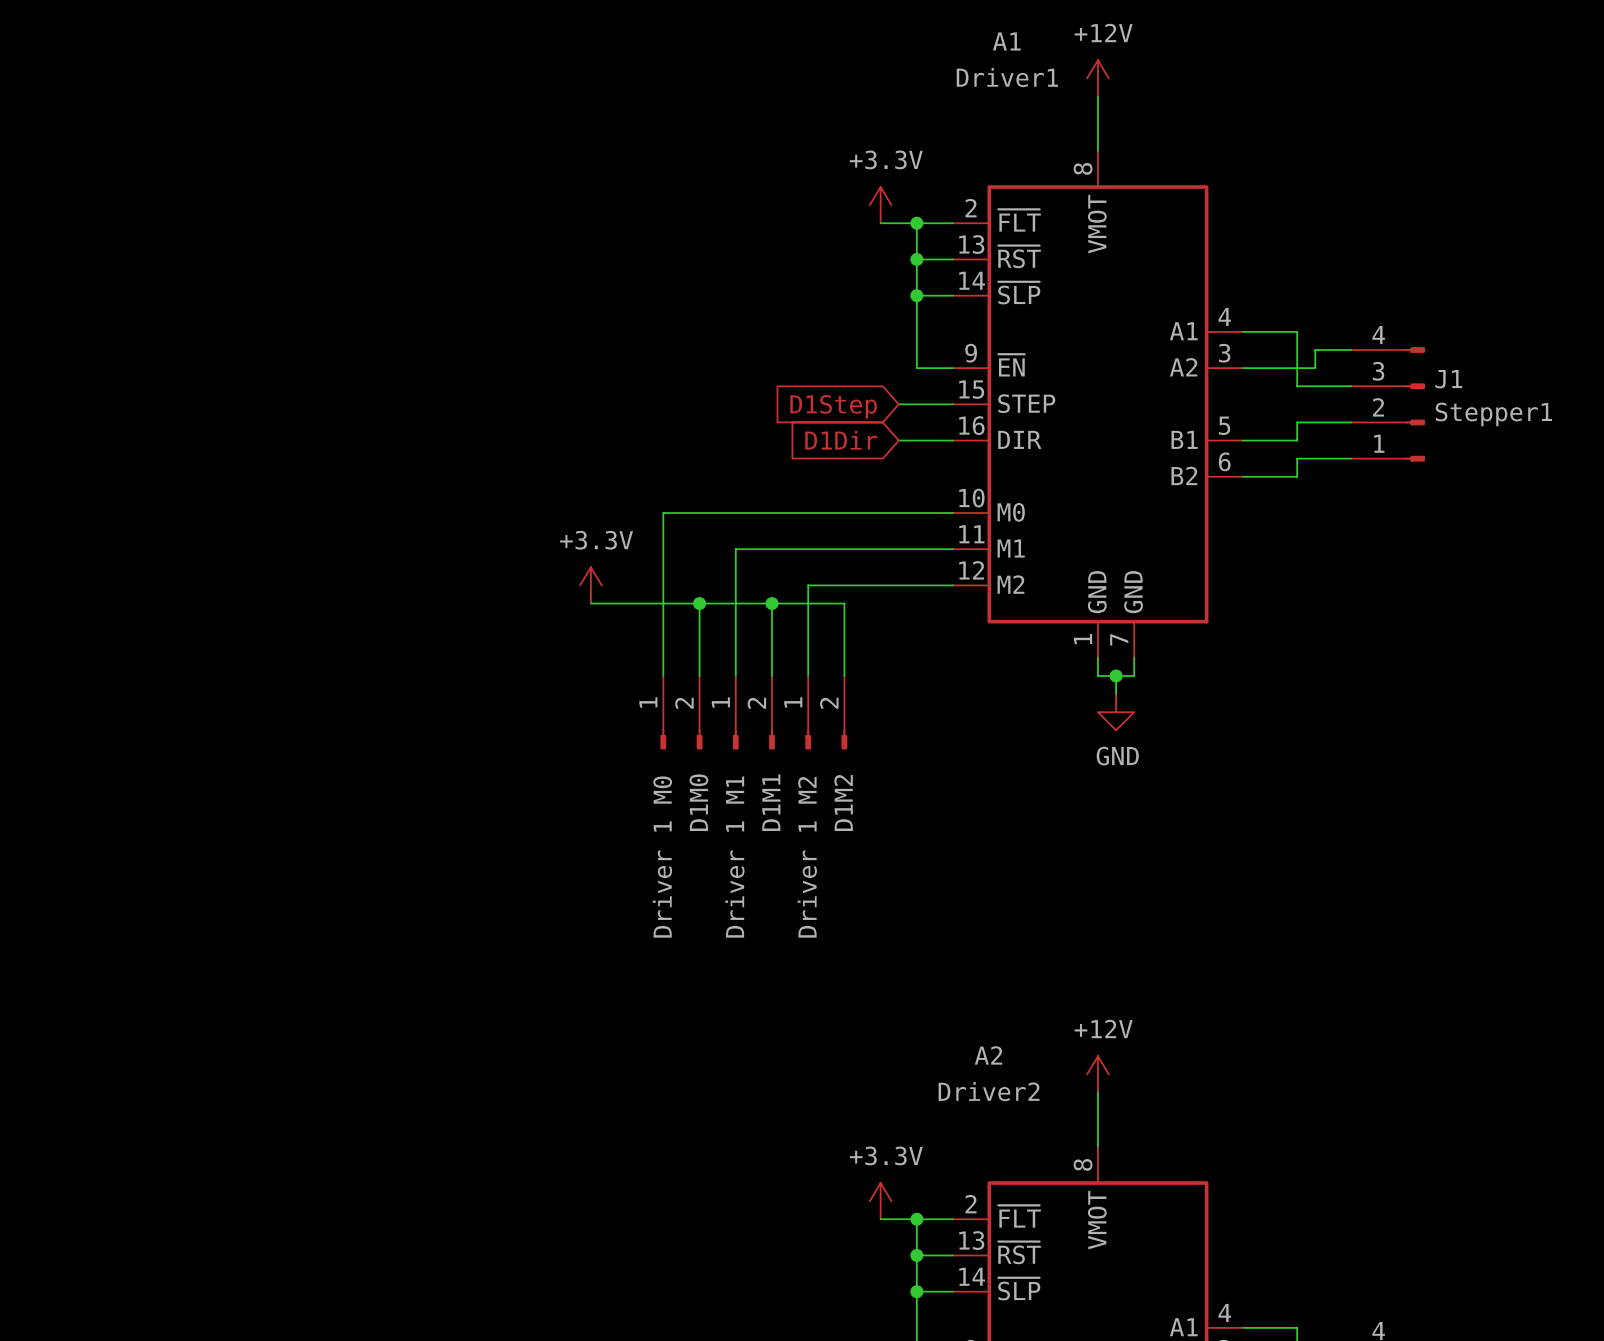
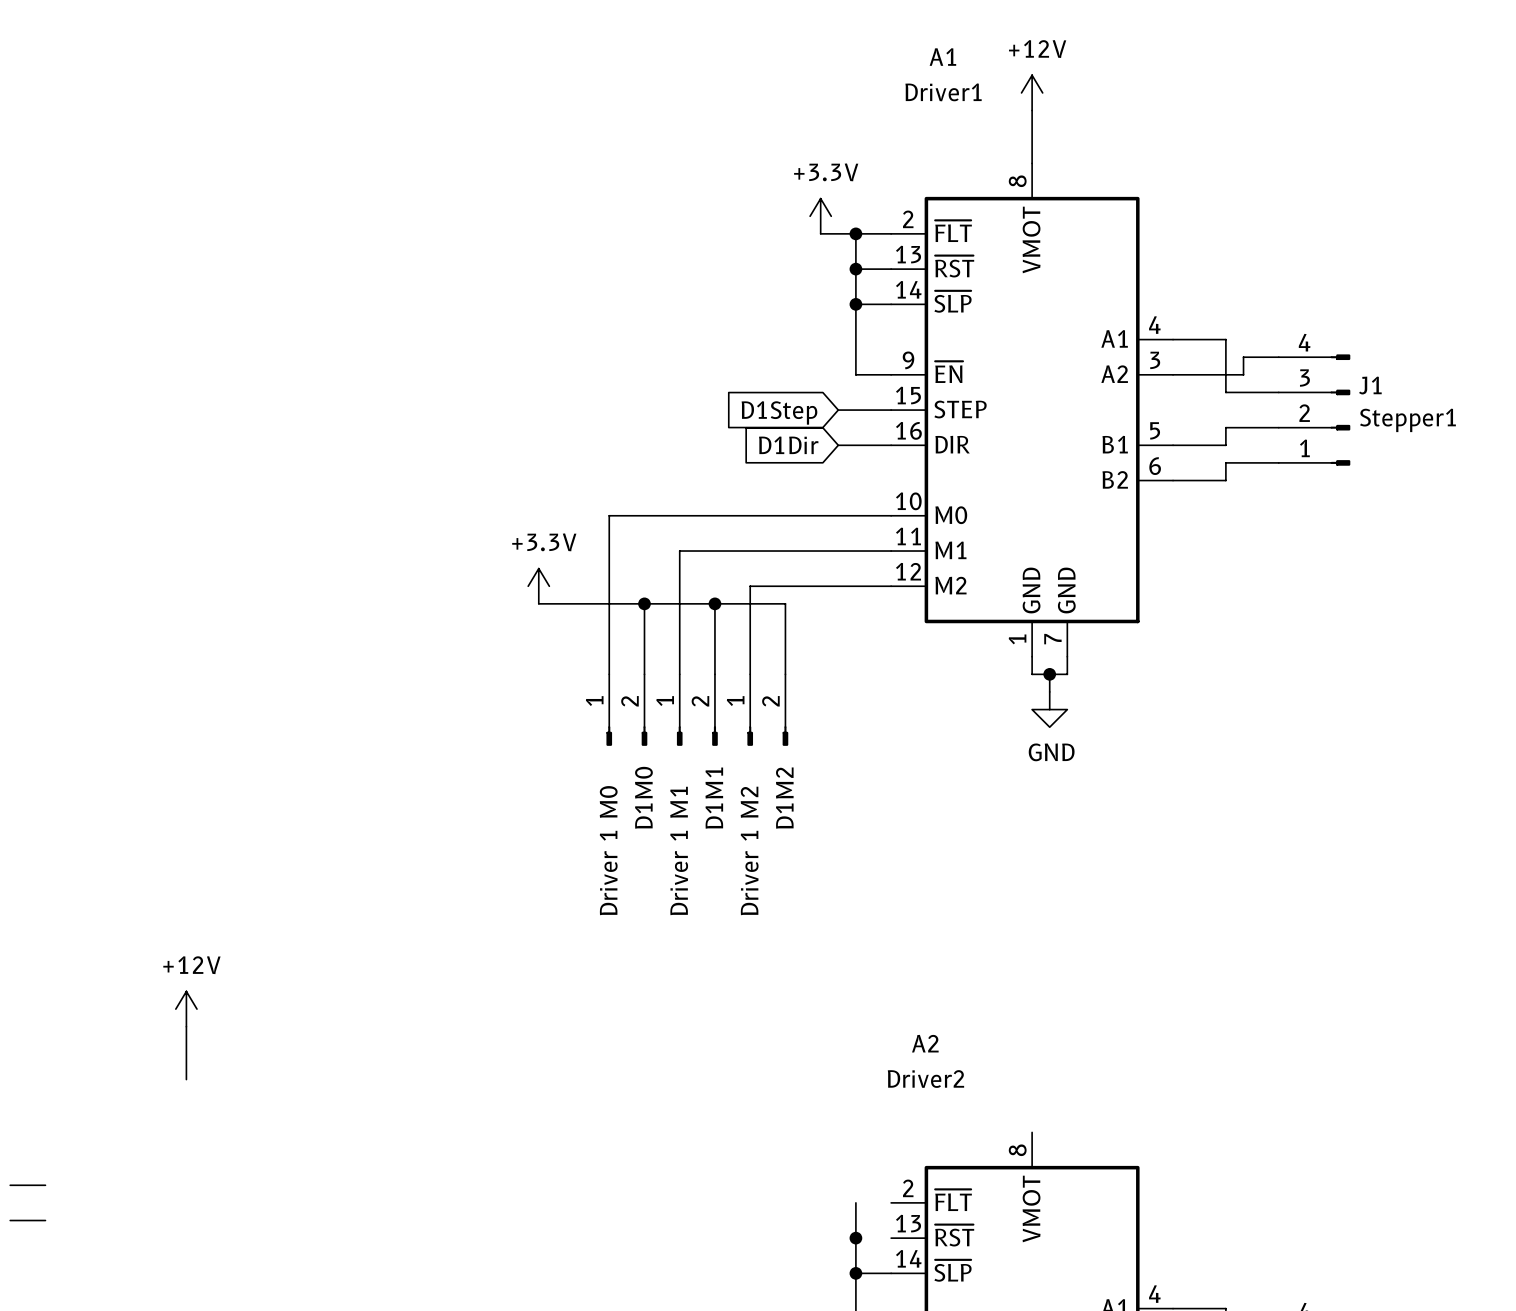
power symbol: none -> +12V (186, 1009)
wire: none -> (186, 1026) (186, 1079)
power symbol: +12V (1097, 1074) -> none
wire: (1097, 1092) (1097, 1146) -> none
wire: none -> (10, 1185) (45, 1185)
power symbol: +3.3V (880, 1201) -> none
wire: (880, 1219) (953, 1219) -> none
junction: (916, 1219) -> none
wire: none -> (10, 1220) (45, 1220)
wire: (916, 1255) (953, 1255) -> none

